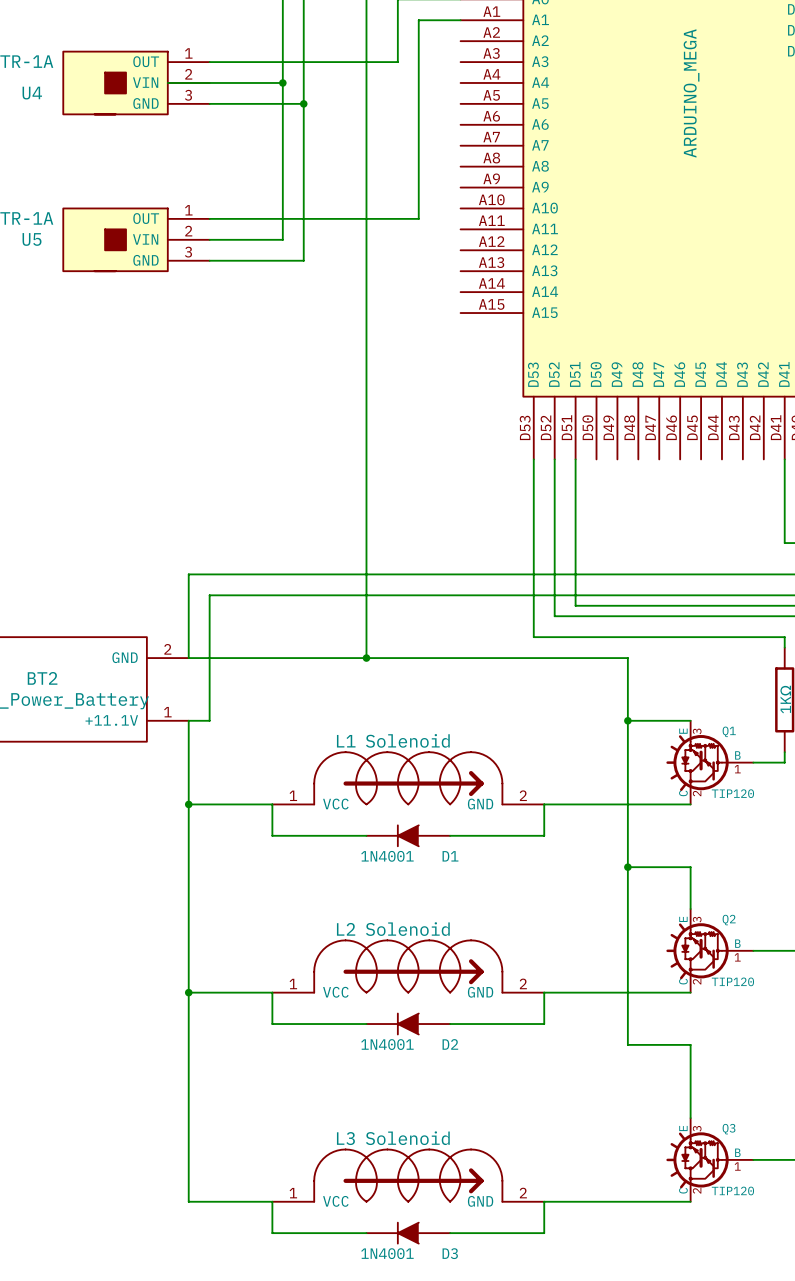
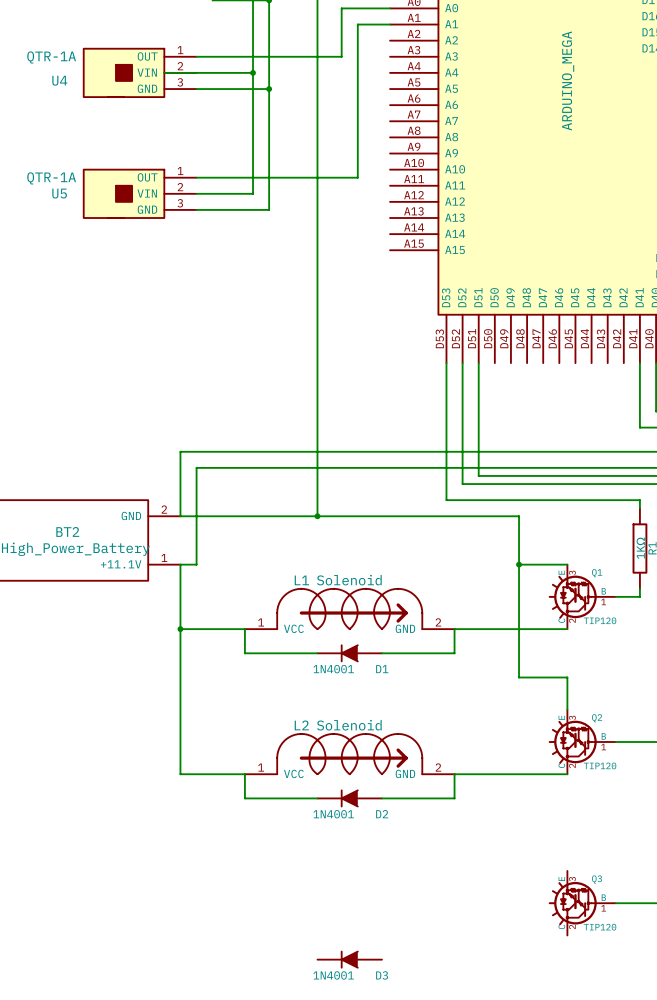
wire: (627, 867) (627, 1044) (690, 1044) (690, 1118) -> none
junction: (627, 867) -> none
wire: (188, 992) (188, 1201) (272, 1201) (272, 1233) (366, 1233) -> none
junction: (188, 992) -> none
L3: Solenoid (408, 1175) -> none
wire: (690, 1201) (544, 1201) (544, 1233) (450, 1233) -> none

